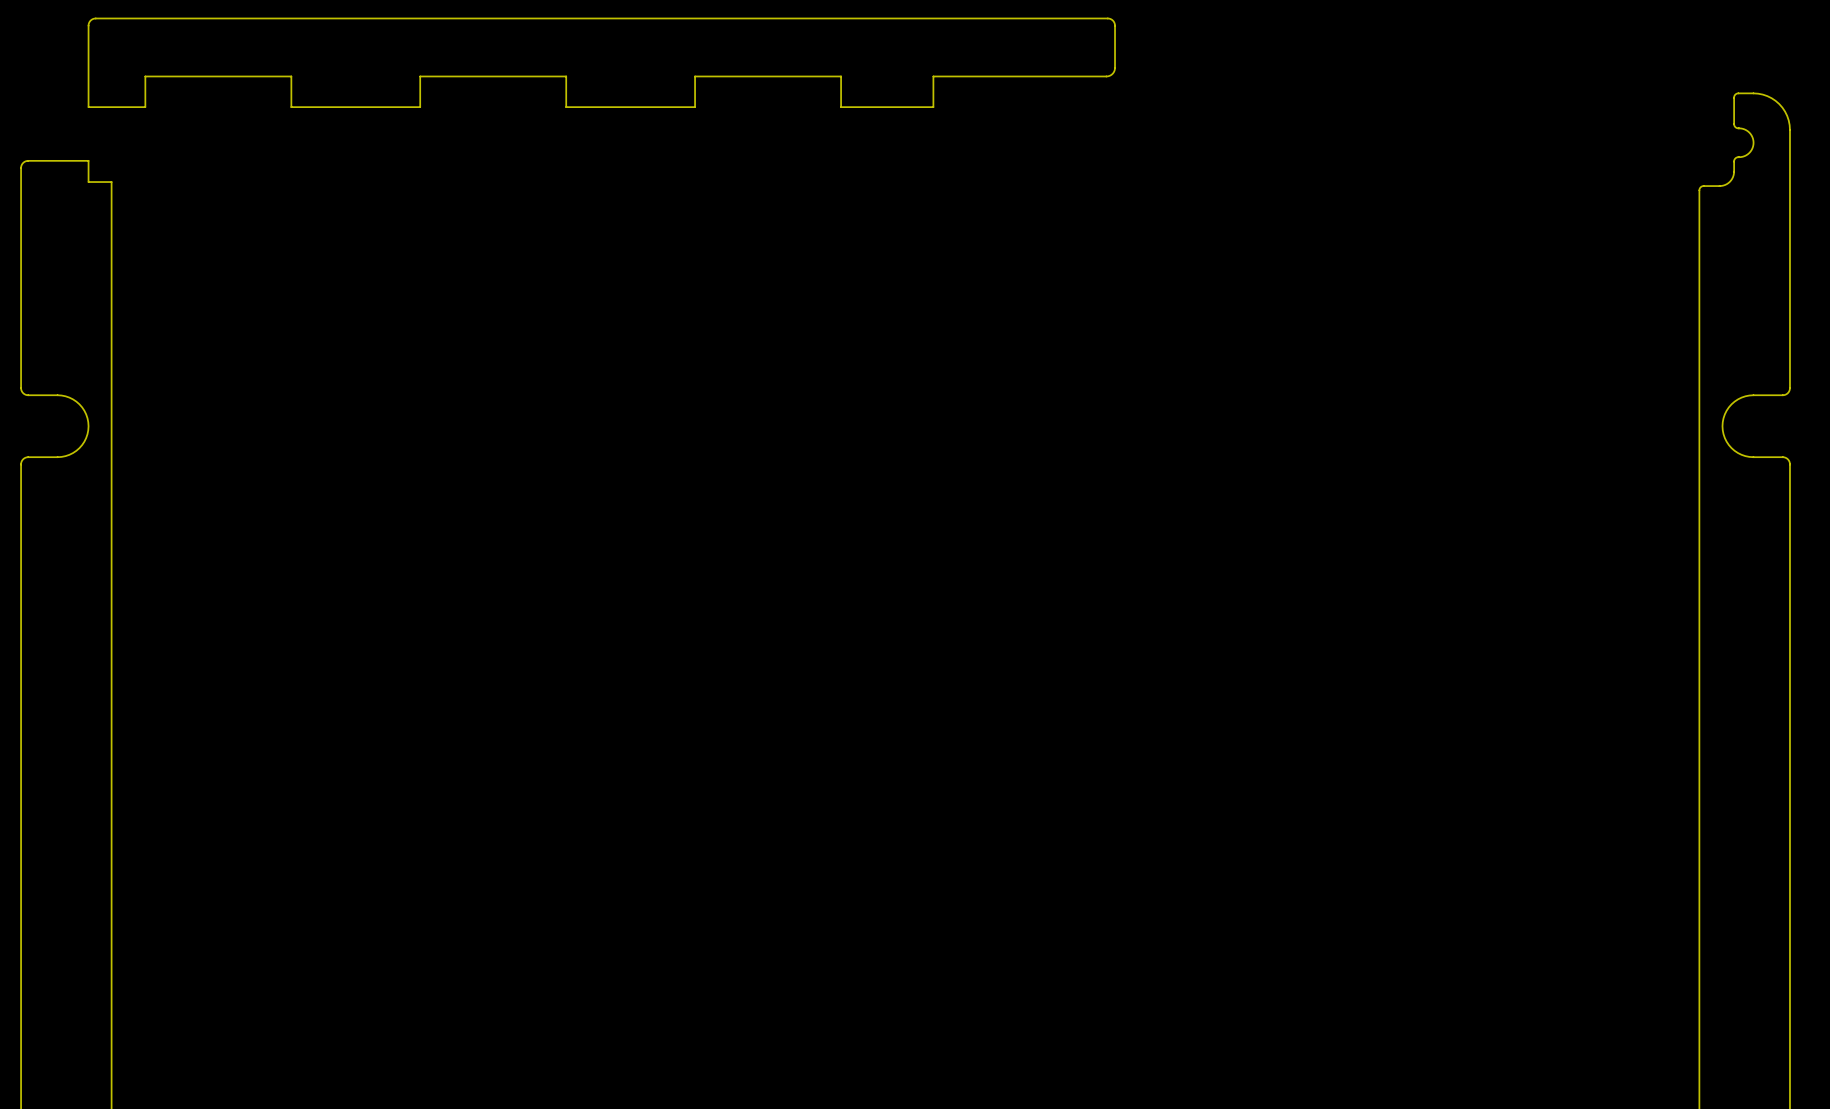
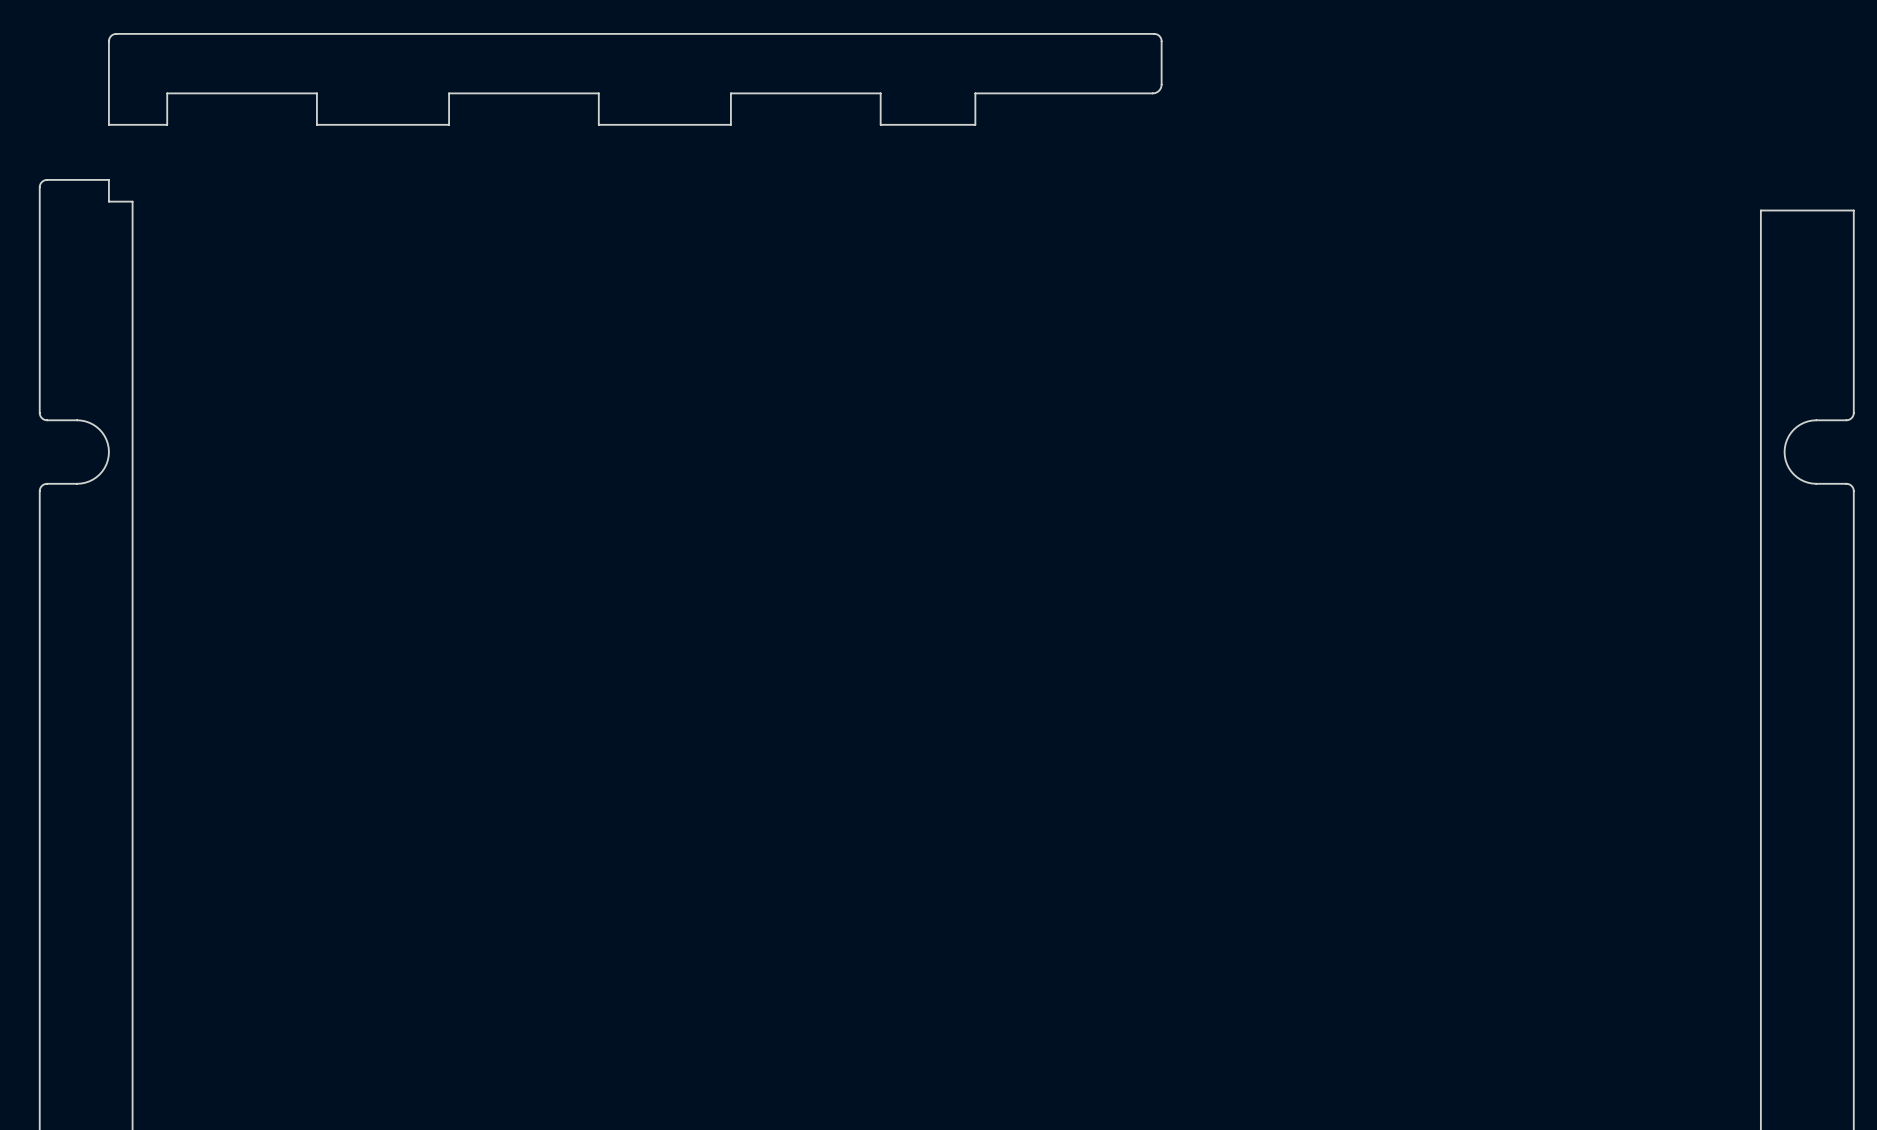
board edge: (1699, 190) (1702, 186) (1721, 185) (1728, 183) (1733, 175) (1734, 158) (1746, 155) (1752, 148) (1753, 140) (1750, 133) (1734, 125) (1734, 97) (1738, 93) (1758, 93) (1767, 96) (1779, 104) (1785, 111) (1789, 129) (1789, 190) -> (1760, 210) (1853, 210)

